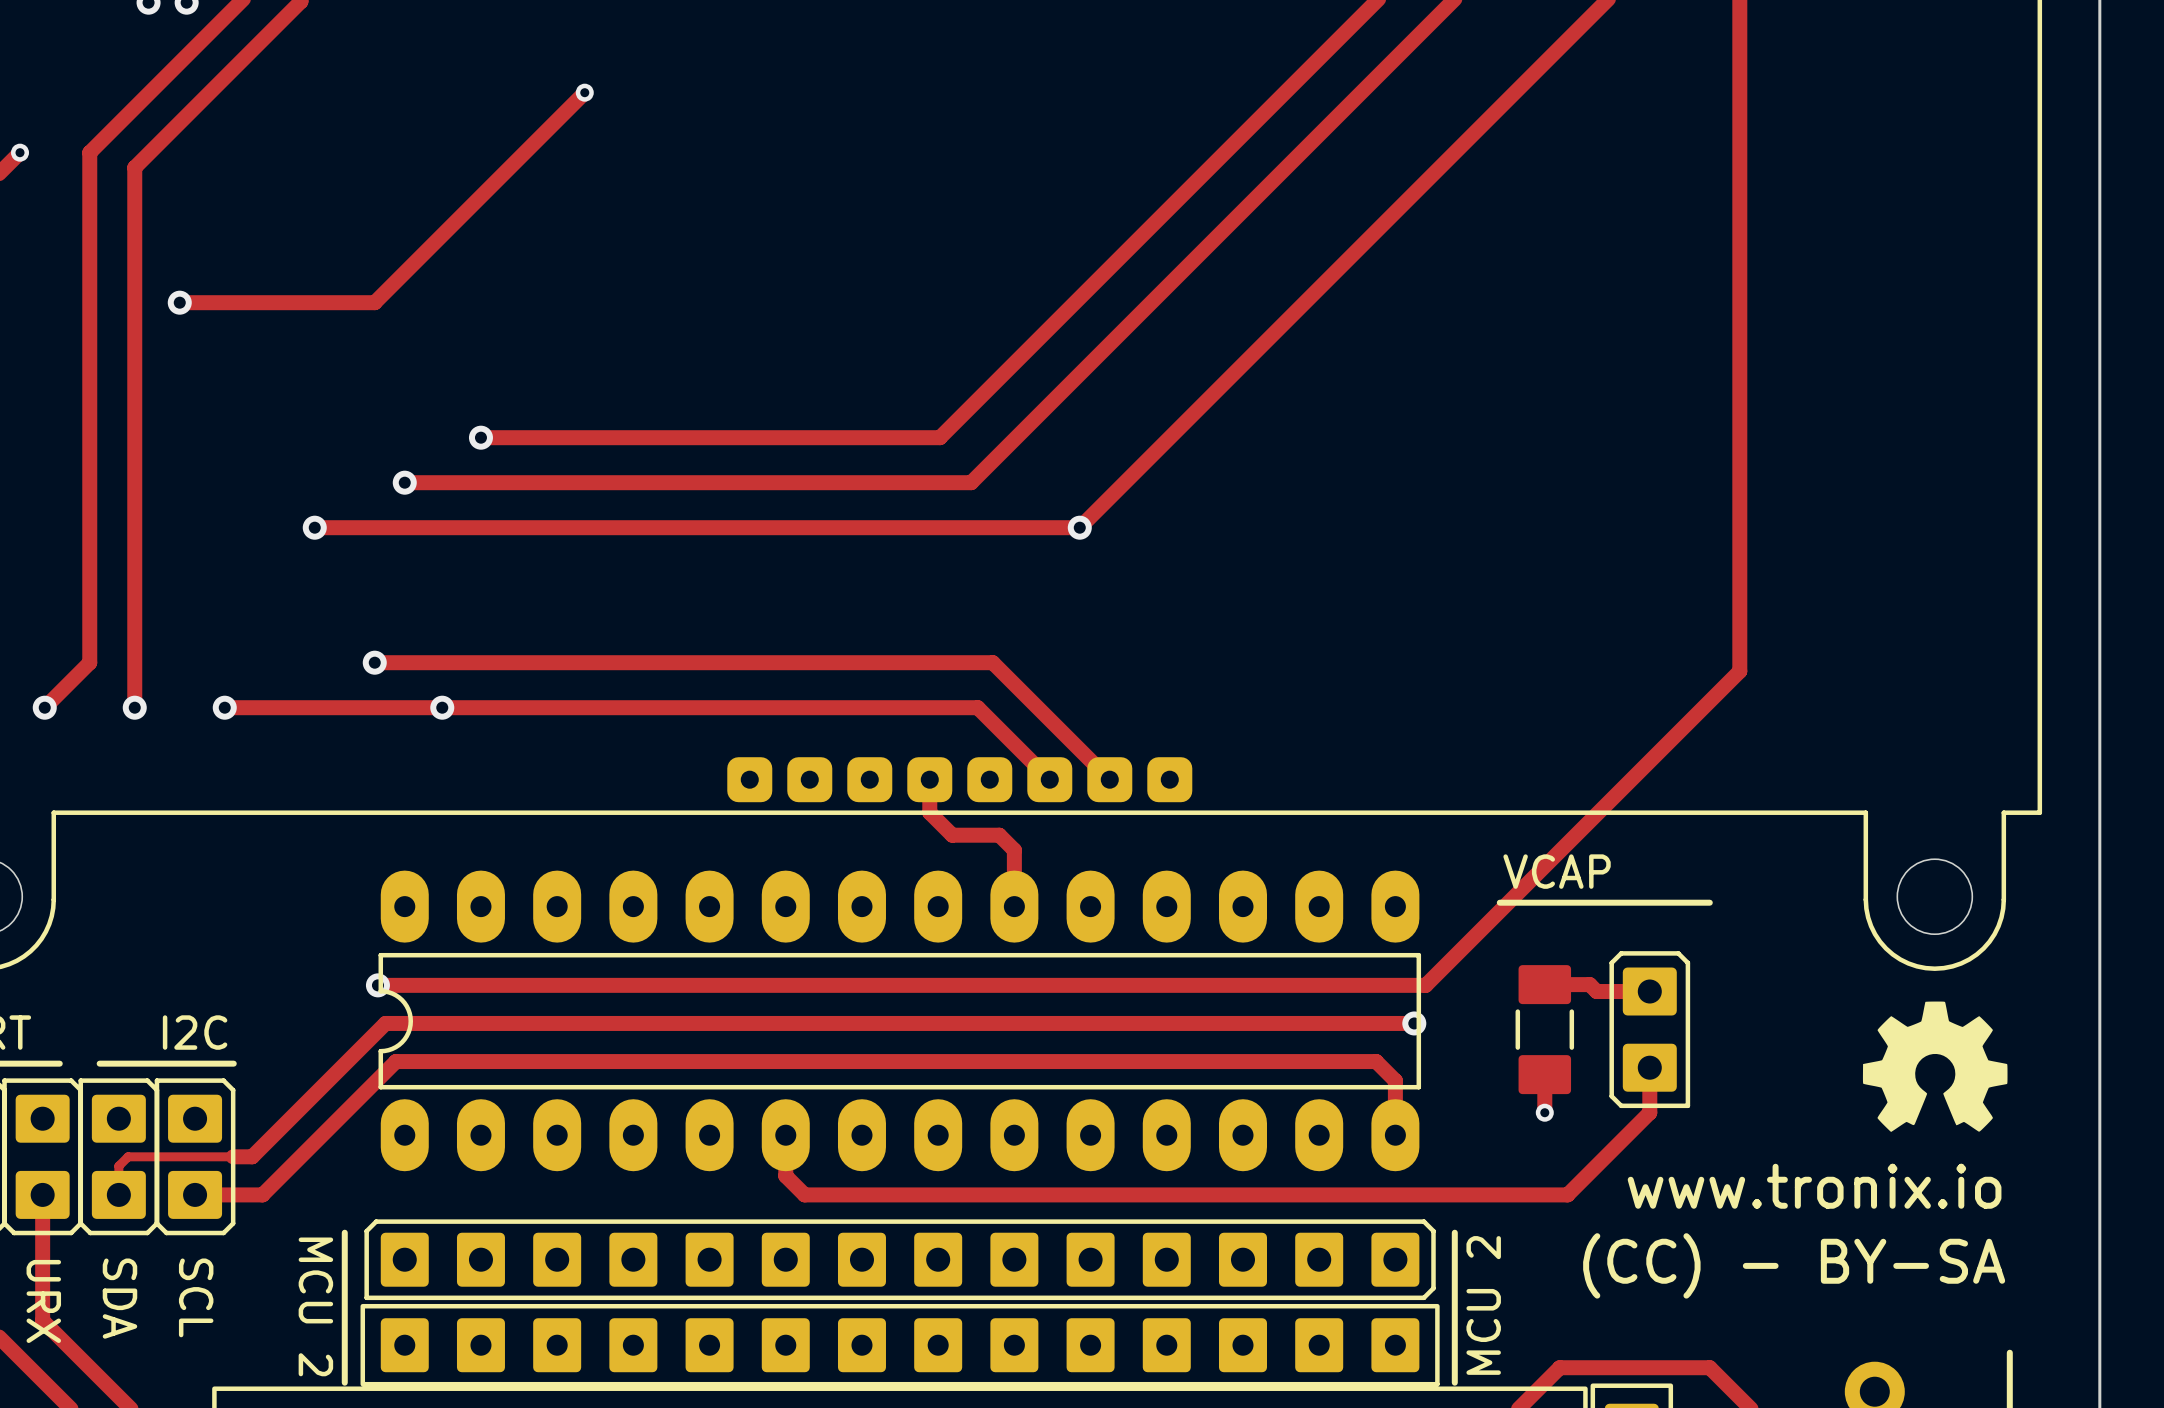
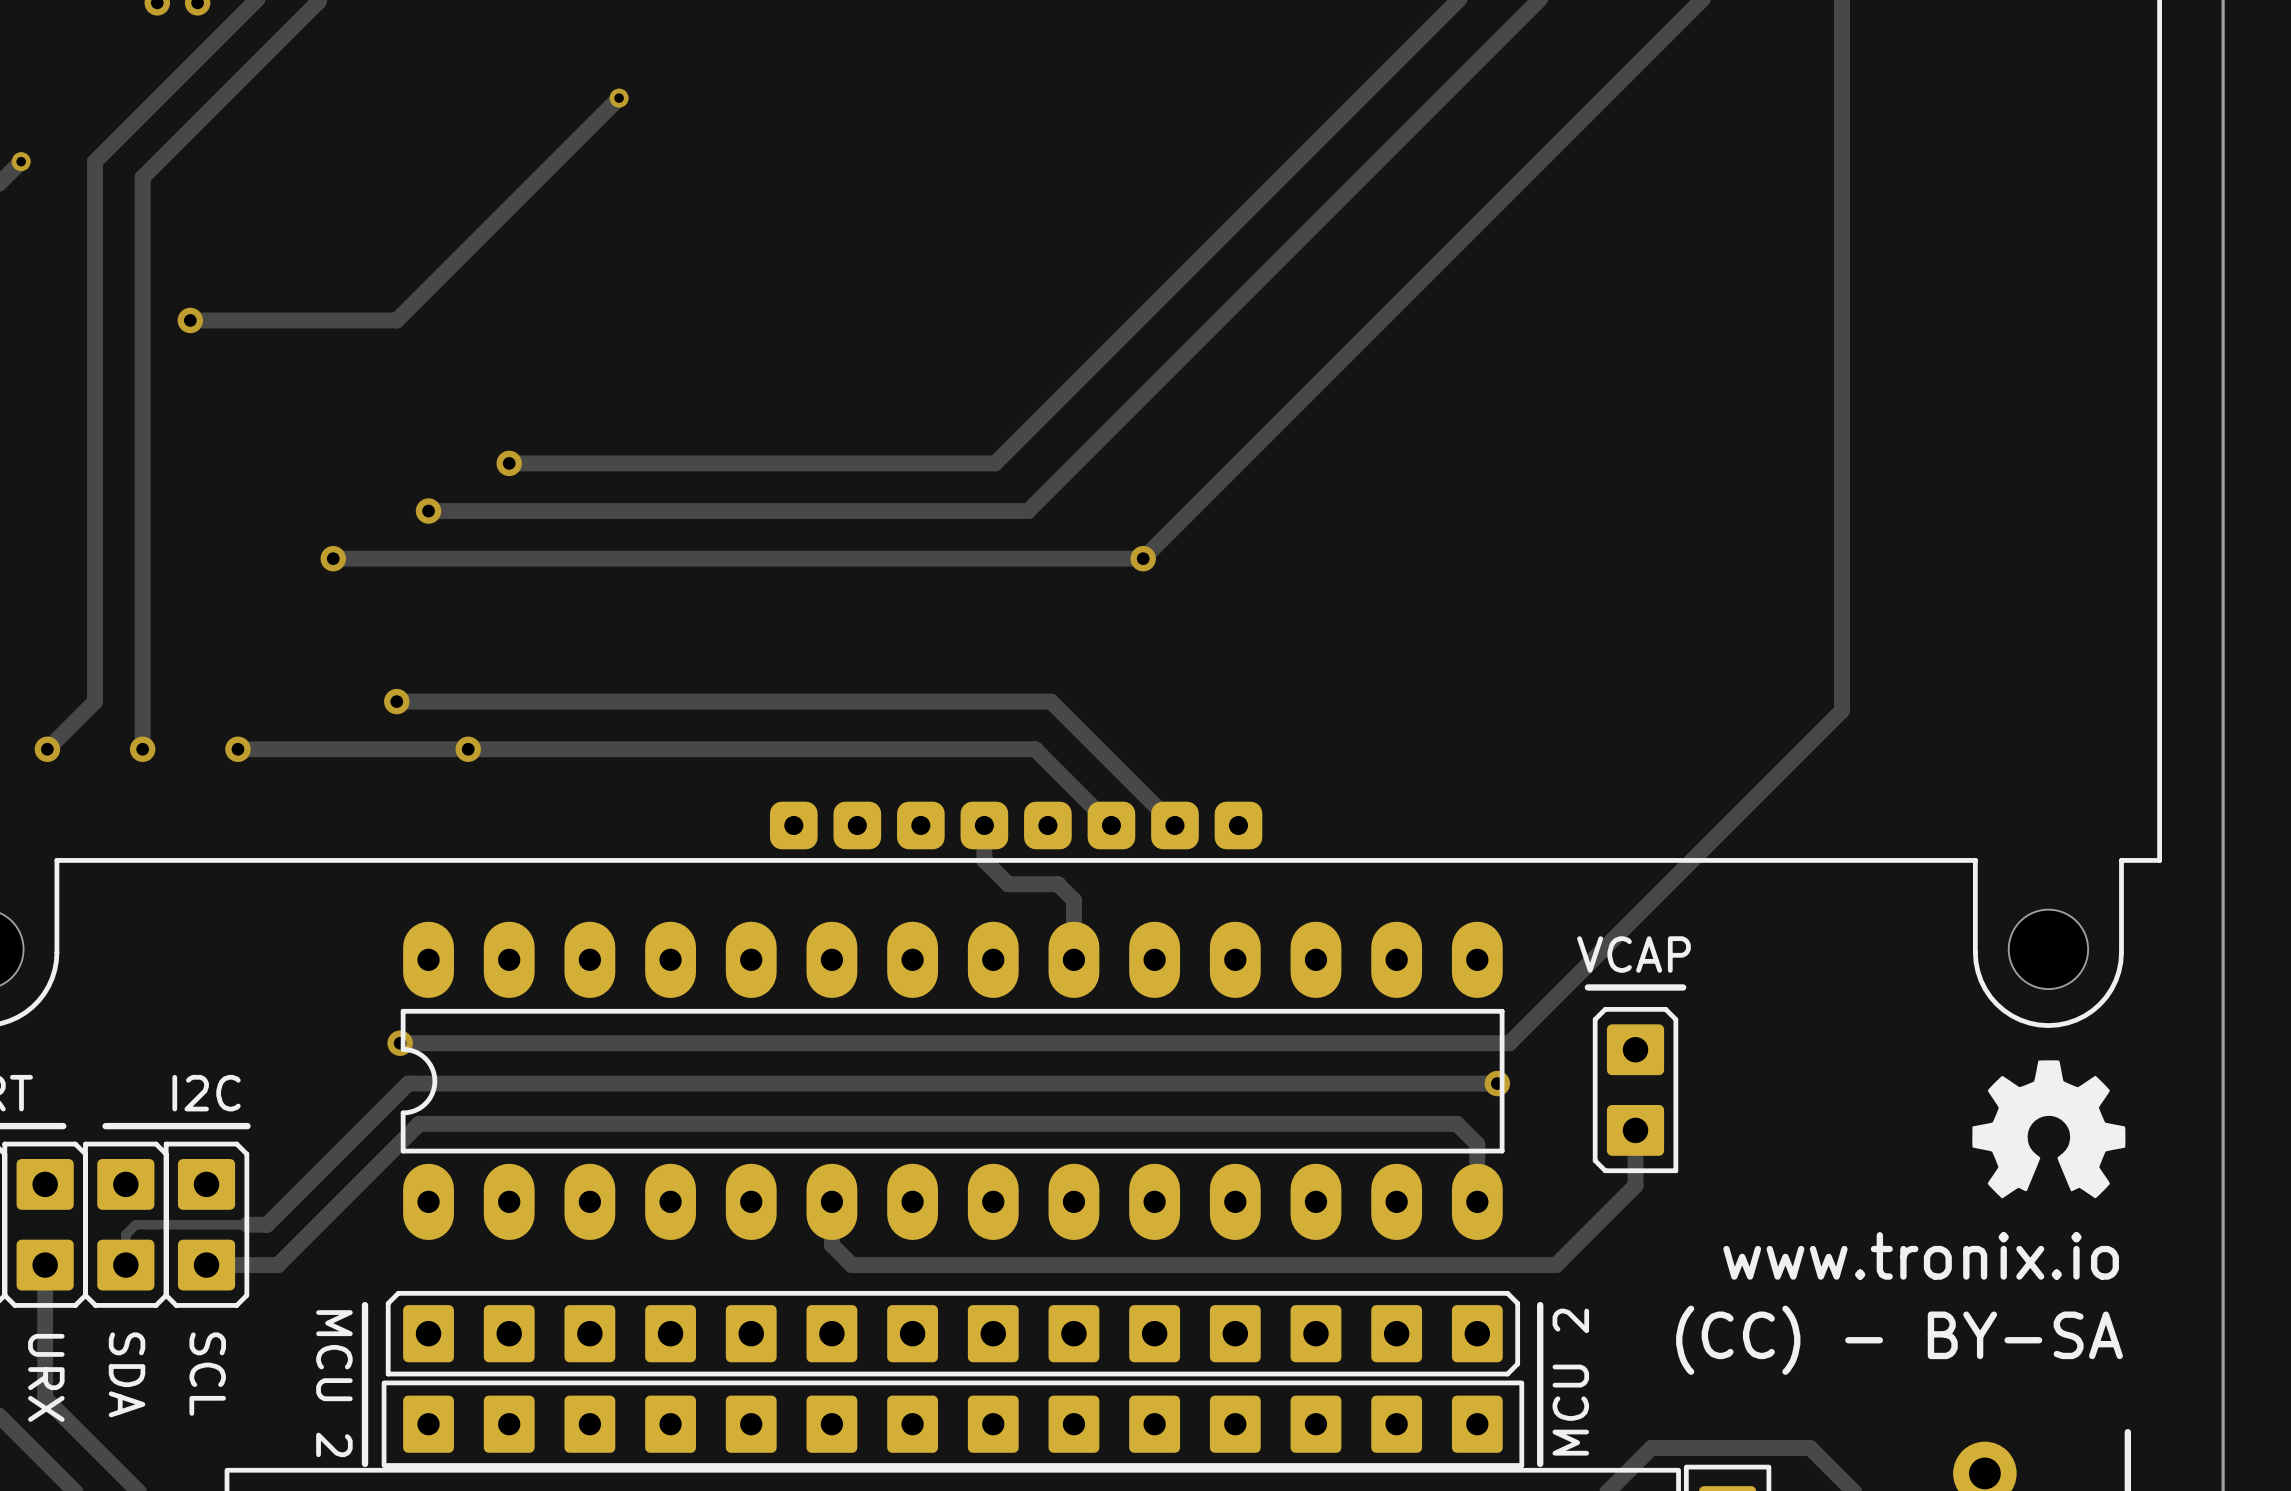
text position: VCAP (1557, 871) -> VCAP (1634, 954)
line: (1499, 902) (1709, 902) -> none
line: none -> (1587, 987) (1683, 987)
part footprint: [1515, 965, 1575, 1095] -> [1592, 1007, 1679, 1174]
track: (1544, 984) (1589, 984) (1596, 991) (1649, 991) -> none
part: (1649, 1029) -> none
track: (1649, 1067) (1649, 1112) (1567, 1194) (1469, 1194) -> (1635, 1178) (1635, 1185) (1556, 1265)
via: (1544, 1112) -> none

